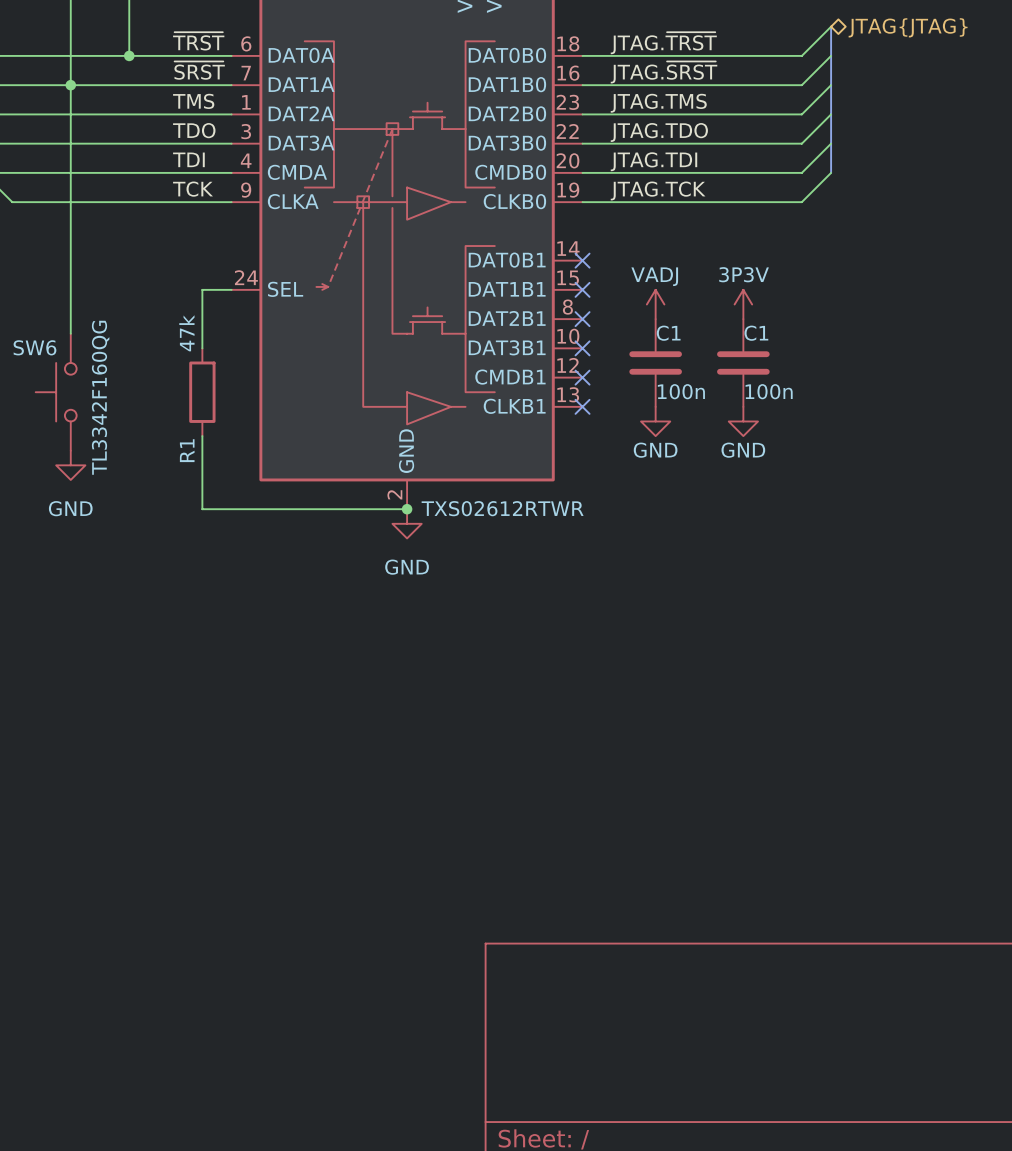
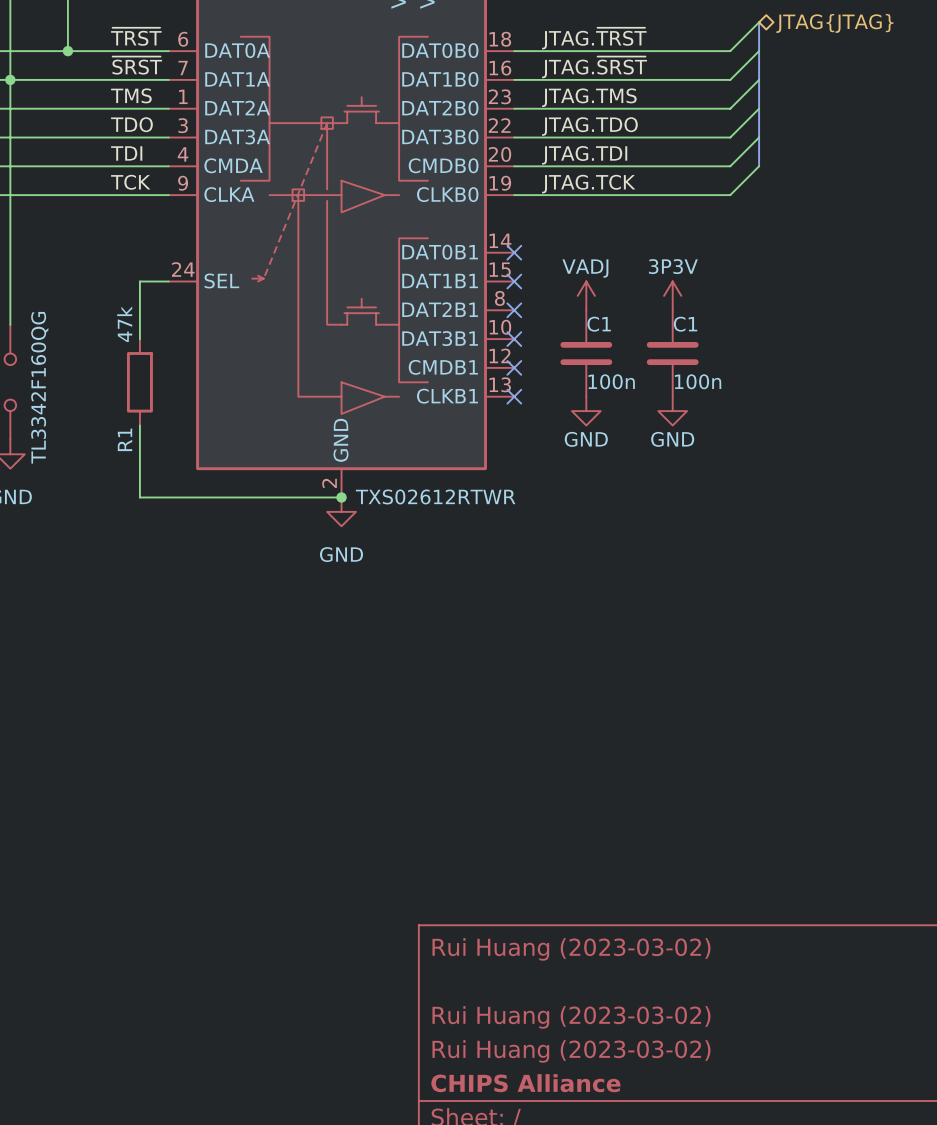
title block: none -> Rui Huang (2023-03-02) (571, 949)
title block: none -> Rui Huang (2023-03-02) (571, 1017)
title block: none -> Rui Huang (2023-03-02) (571, 1051)
title block: none -> CHIPS Alliance (525, 1083)

